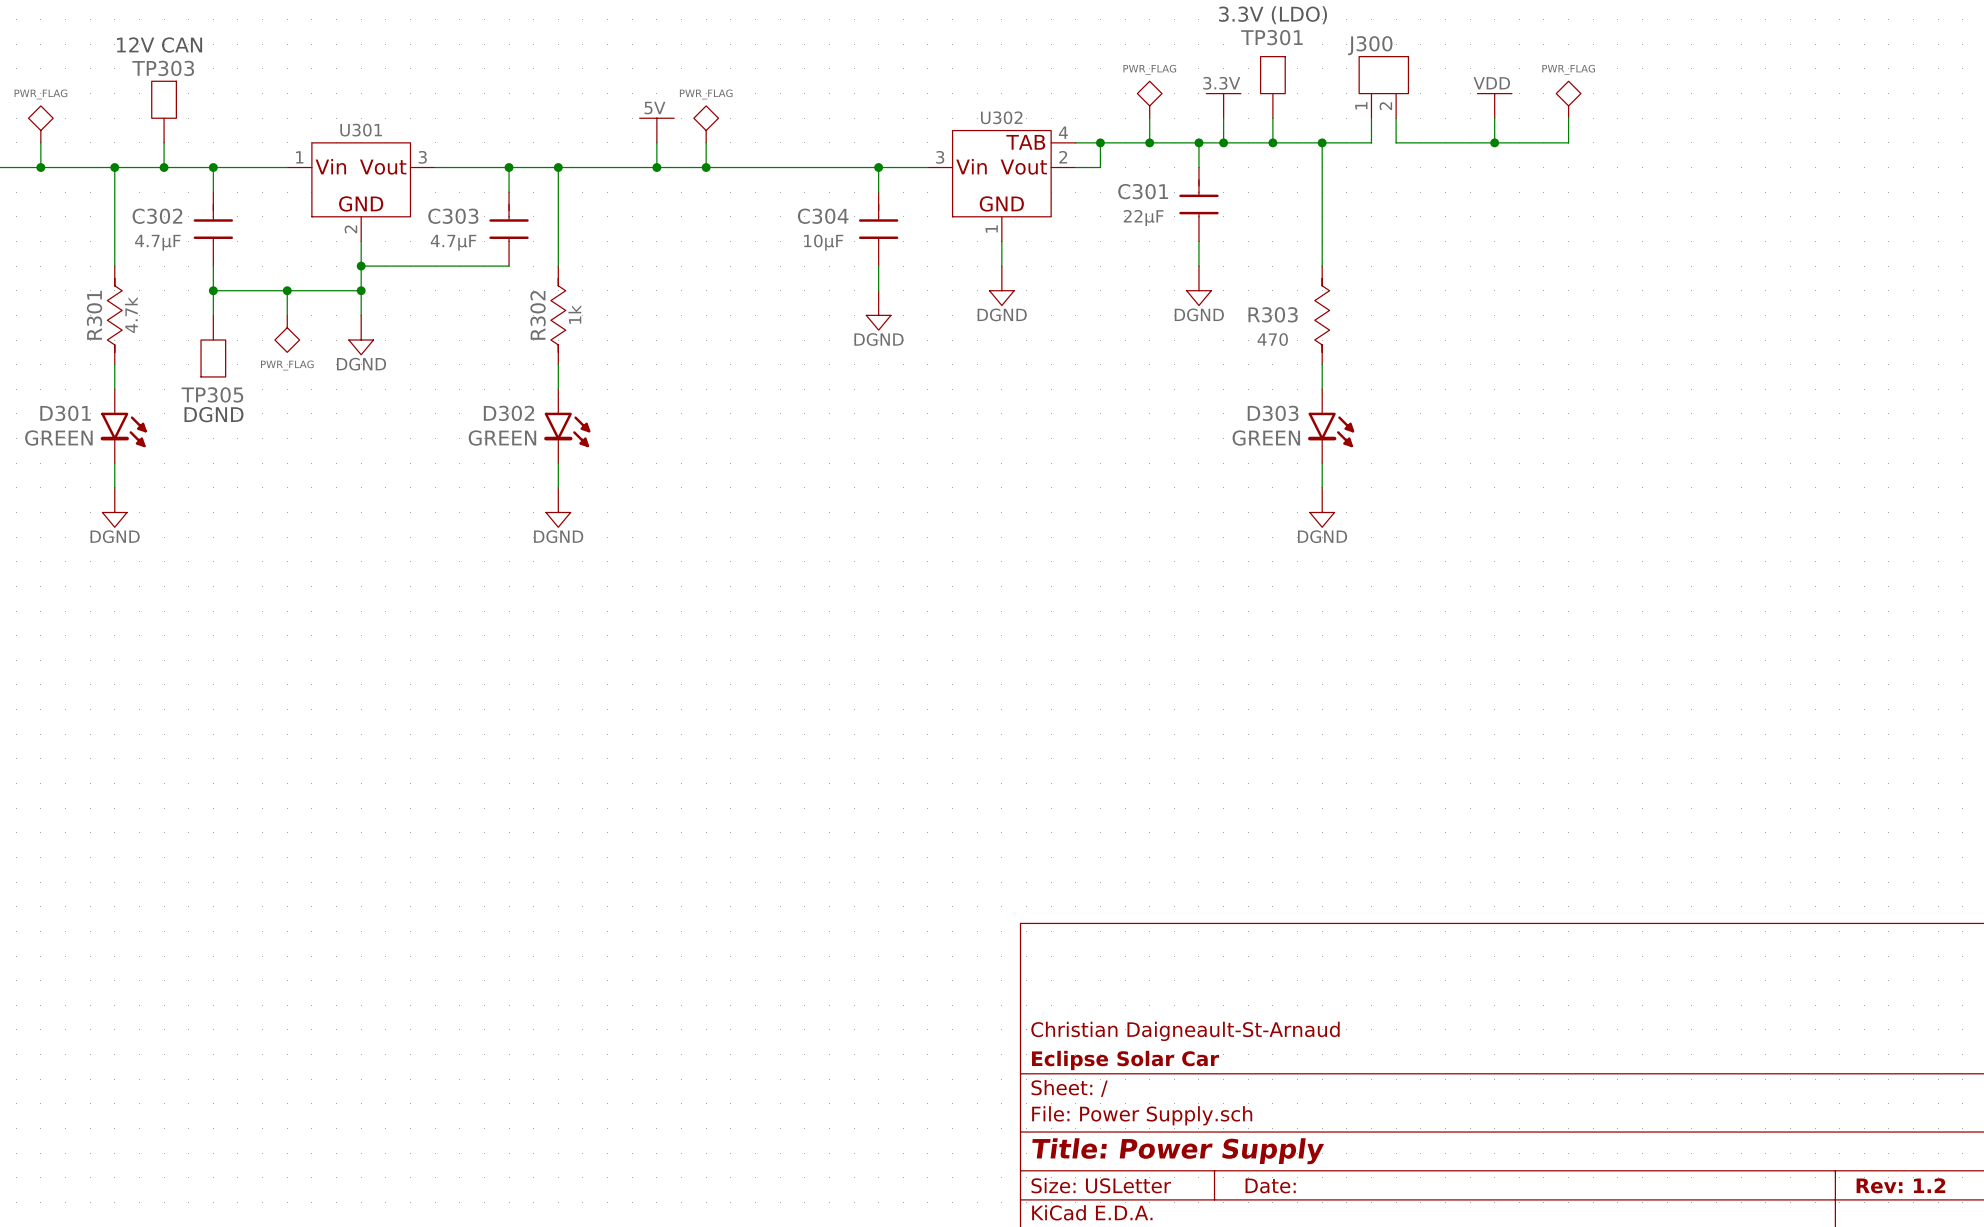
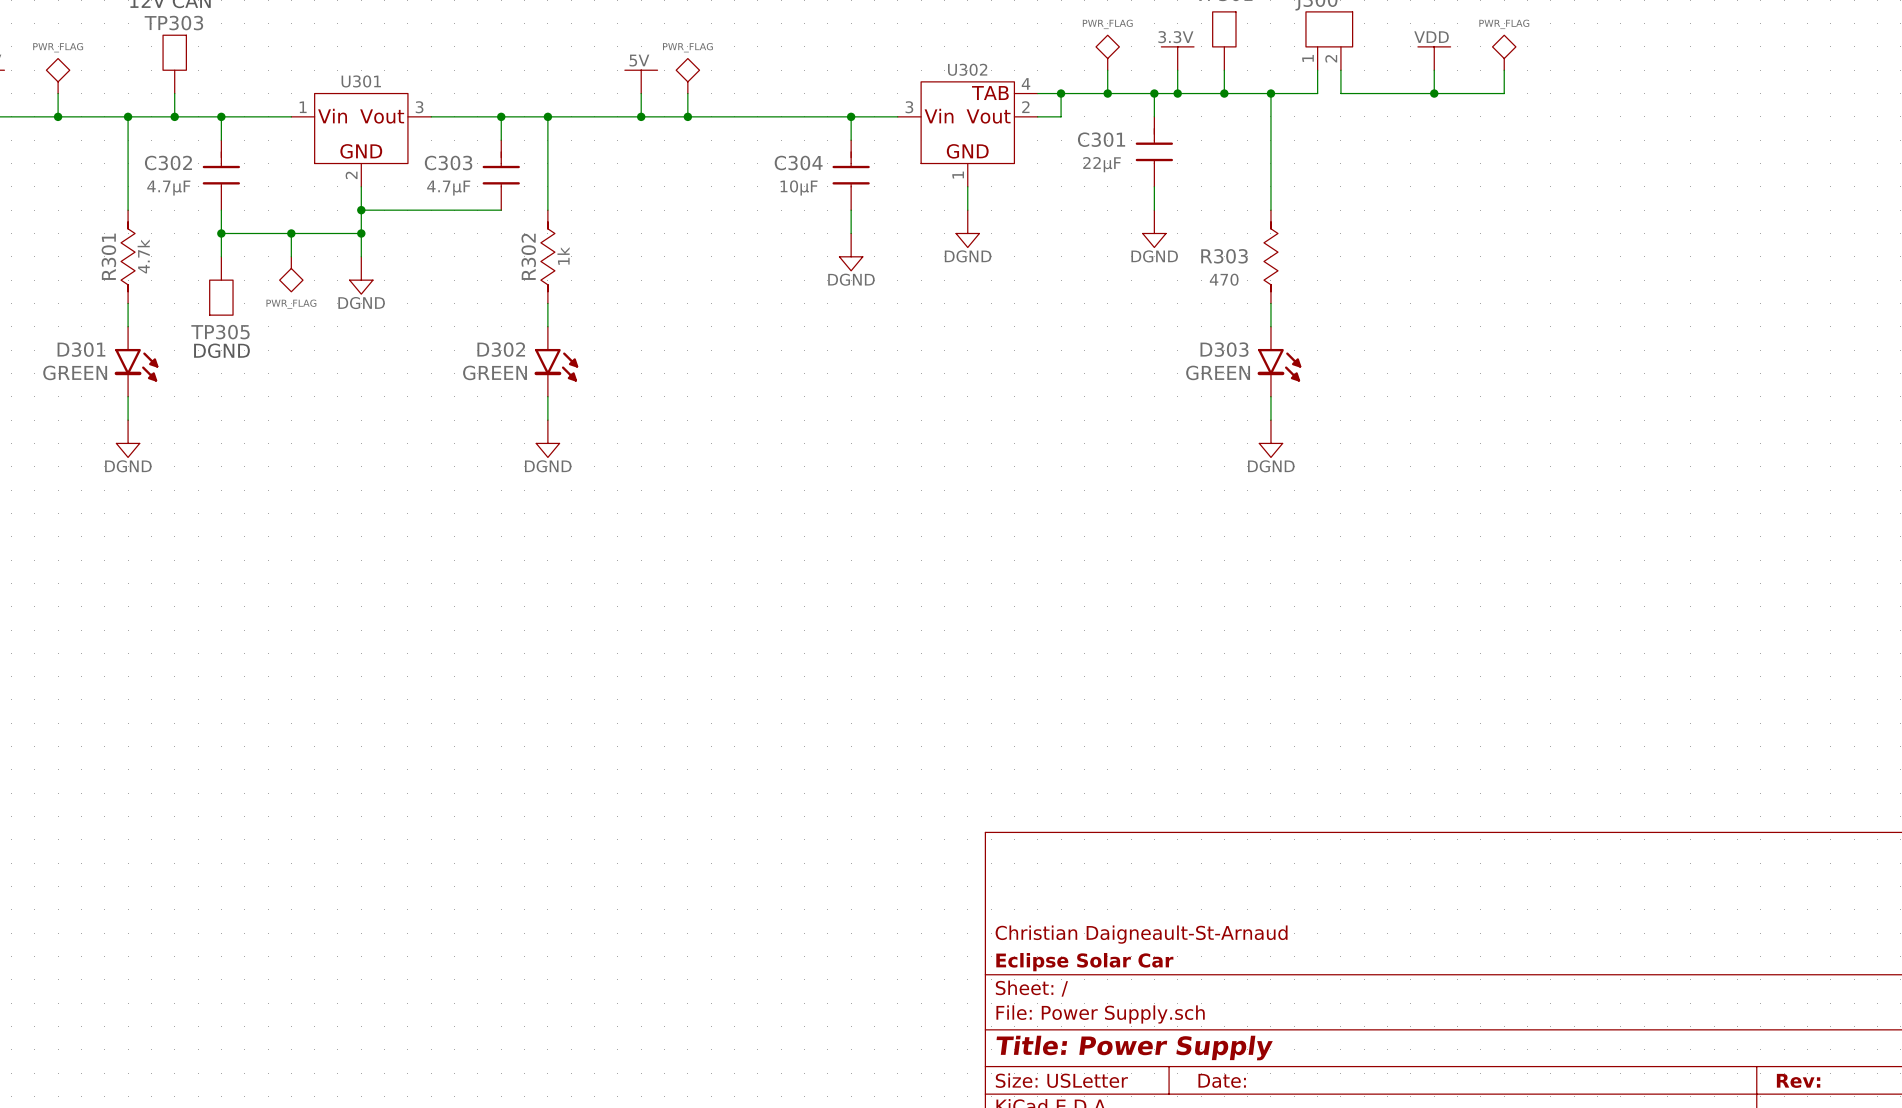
title block: Rev: 1.2 (1900, 1185) -> Rev: (1798, 1080)

